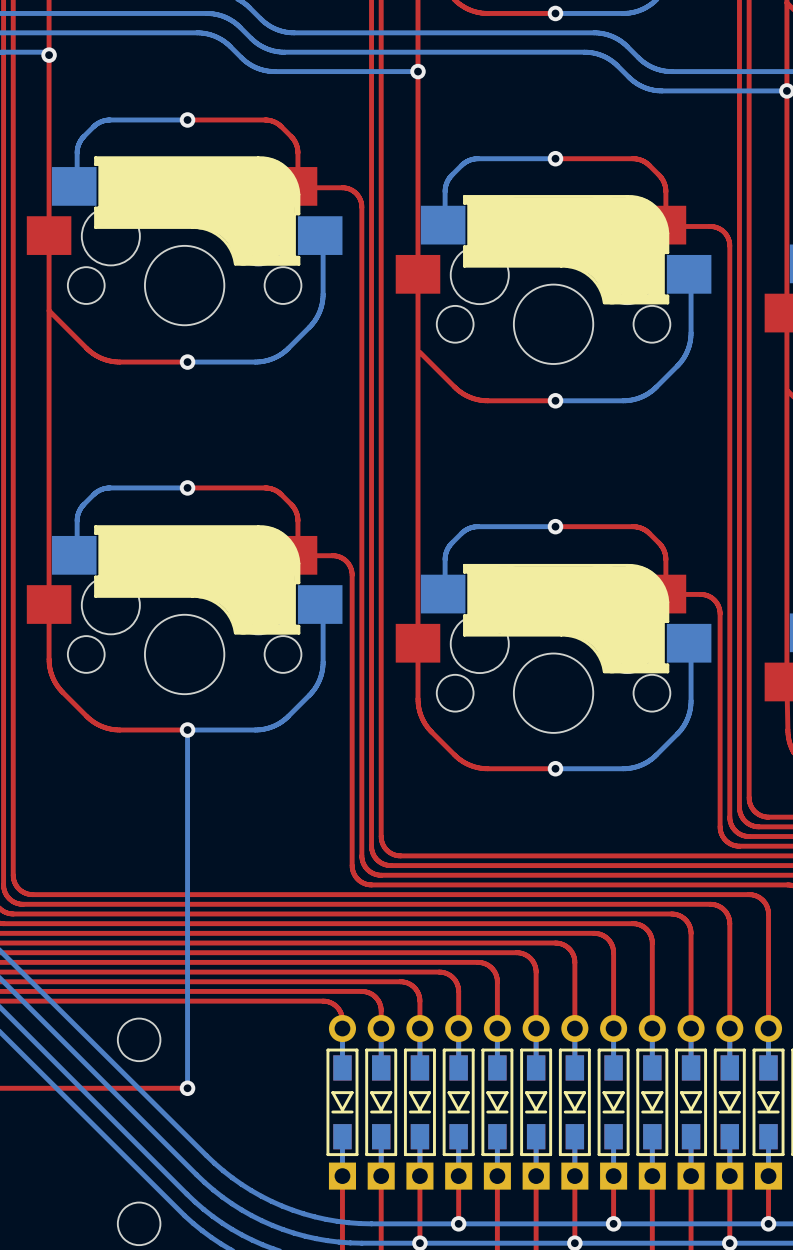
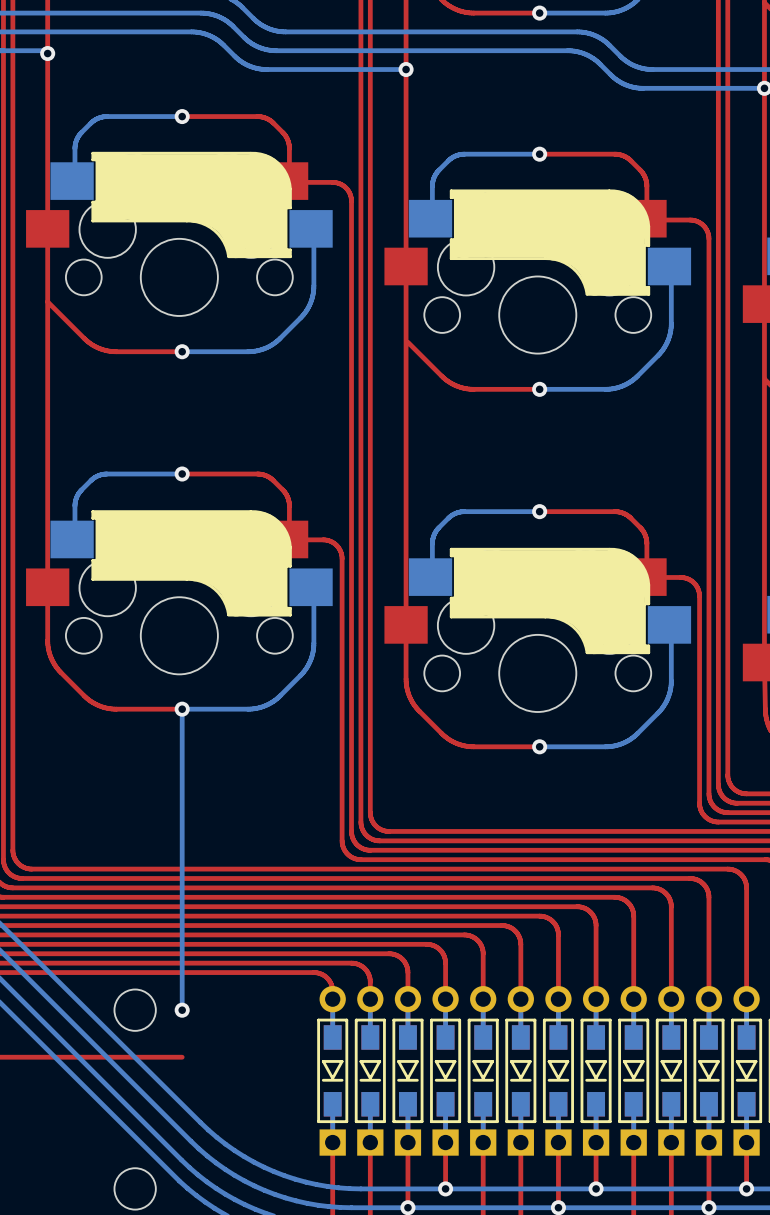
bottom track: (187, 1039) (187, 1088) -> none
via position: (187, 1088) -> (182, 1010)

